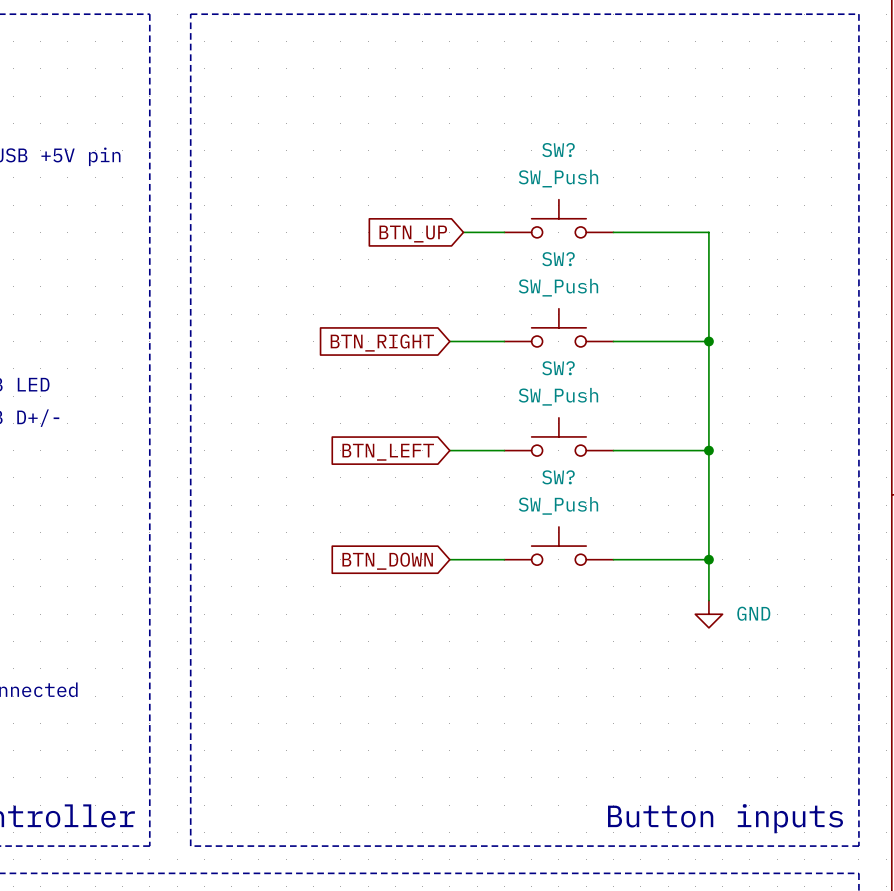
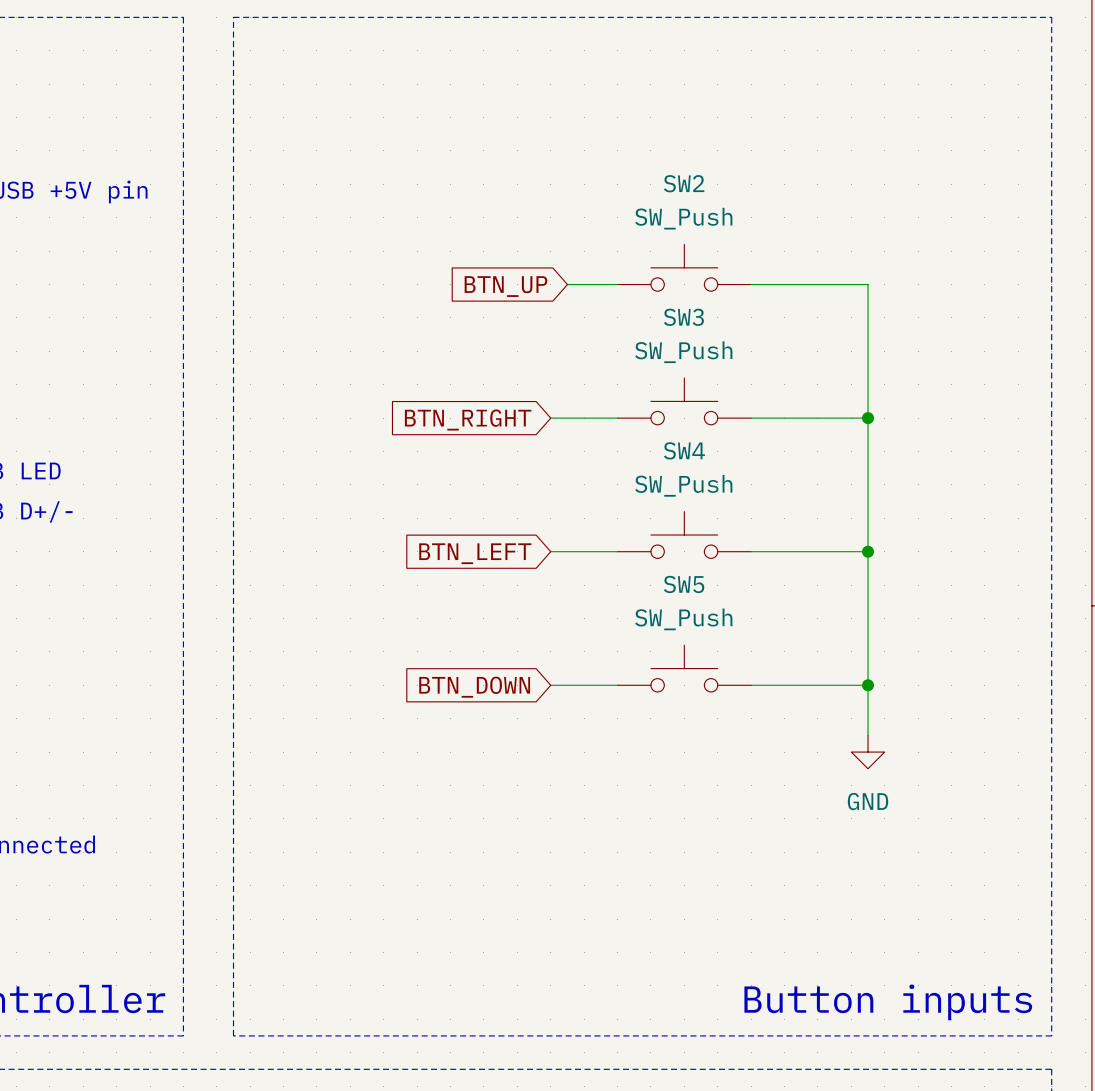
SW? name: SW? (558, 150) -> SW2 (684, 183)
SW? name: SW? (558, 259) -> SW3 (683, 317)
SW? name: SW? (558, 368) -> SW4 (684, 450)
SW? name: SW? (558, 477) -> SW5 (684, 584)
power symbol text position: GND (753, 613) -> GND (868, 801)

